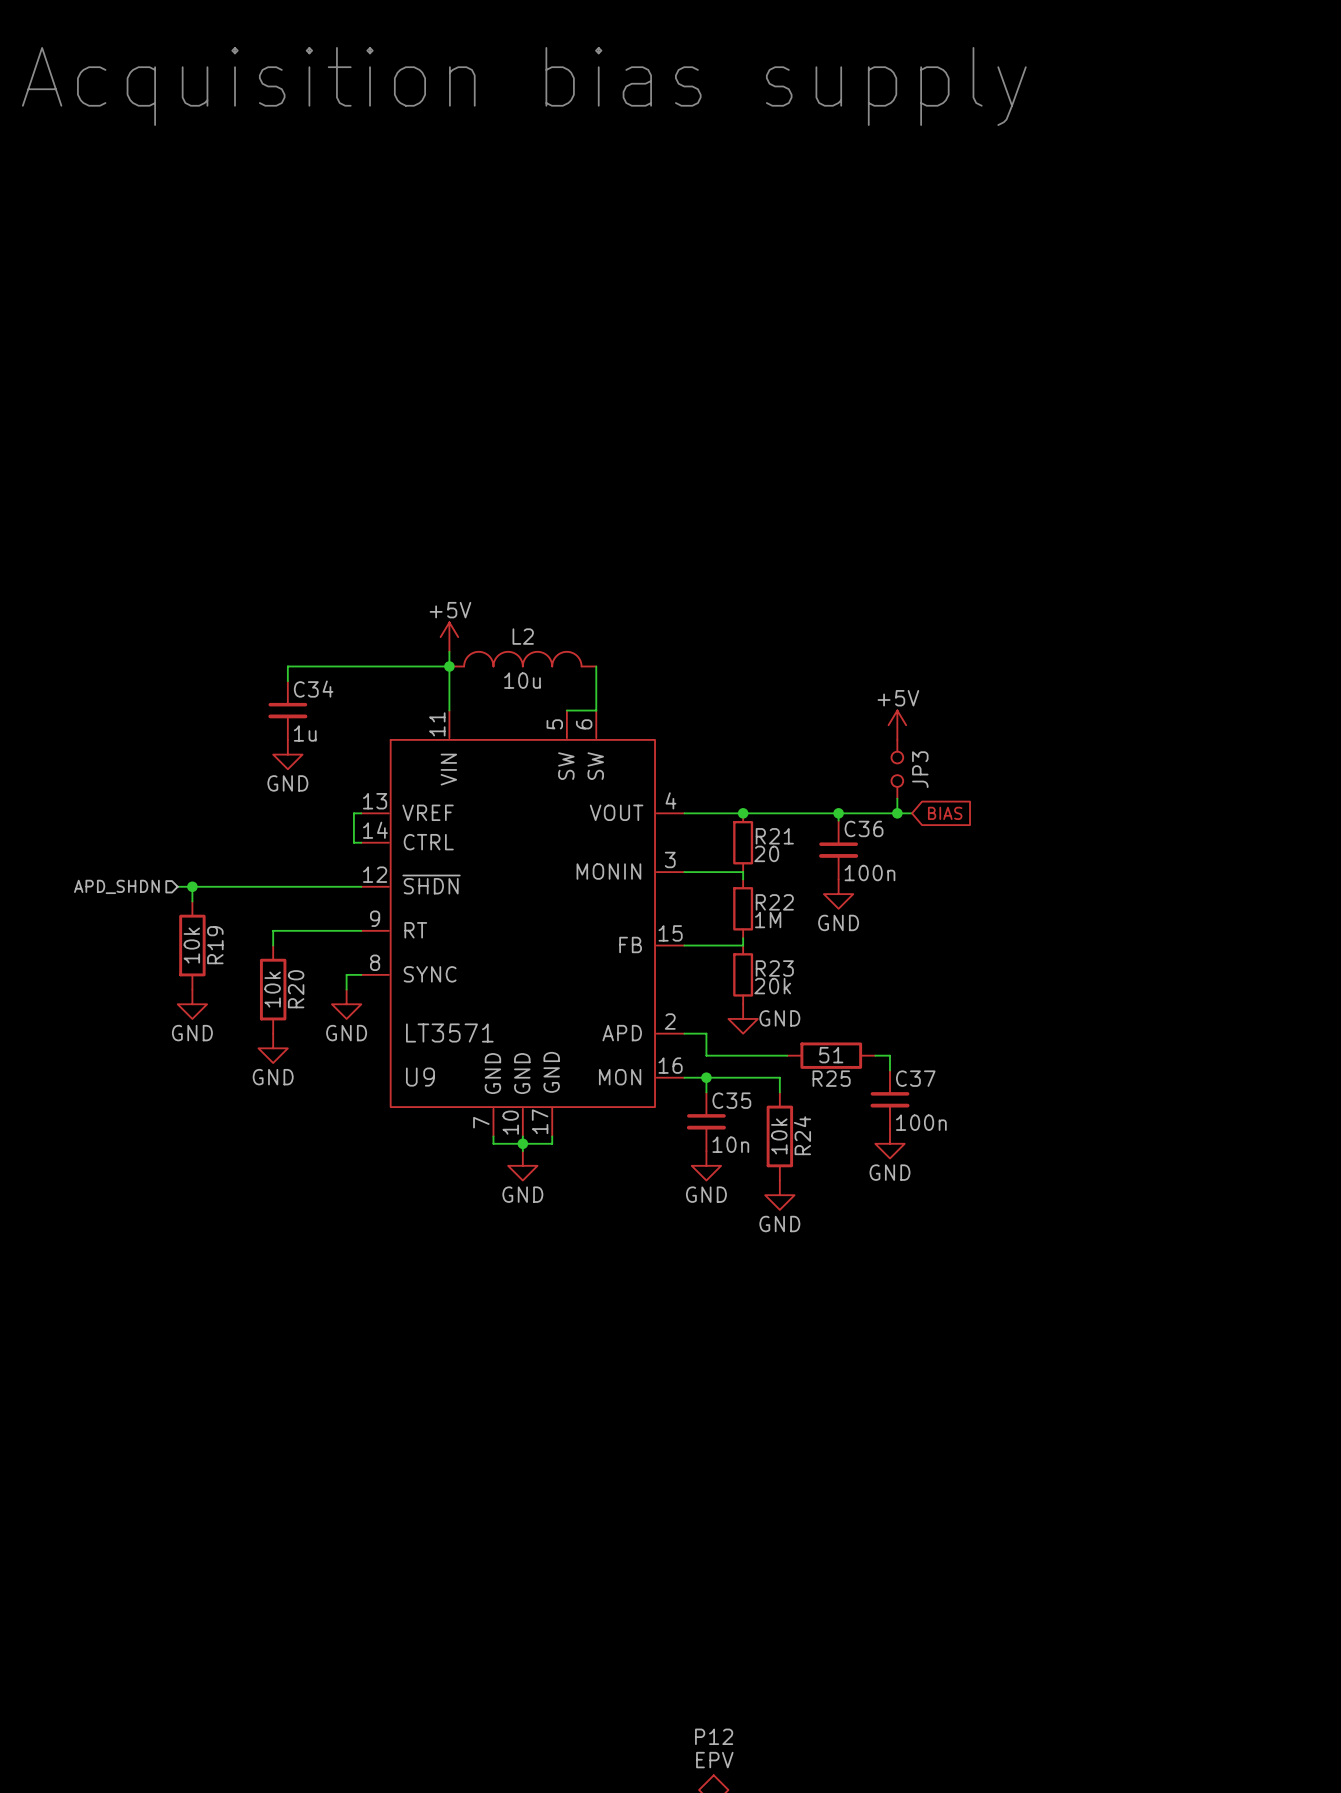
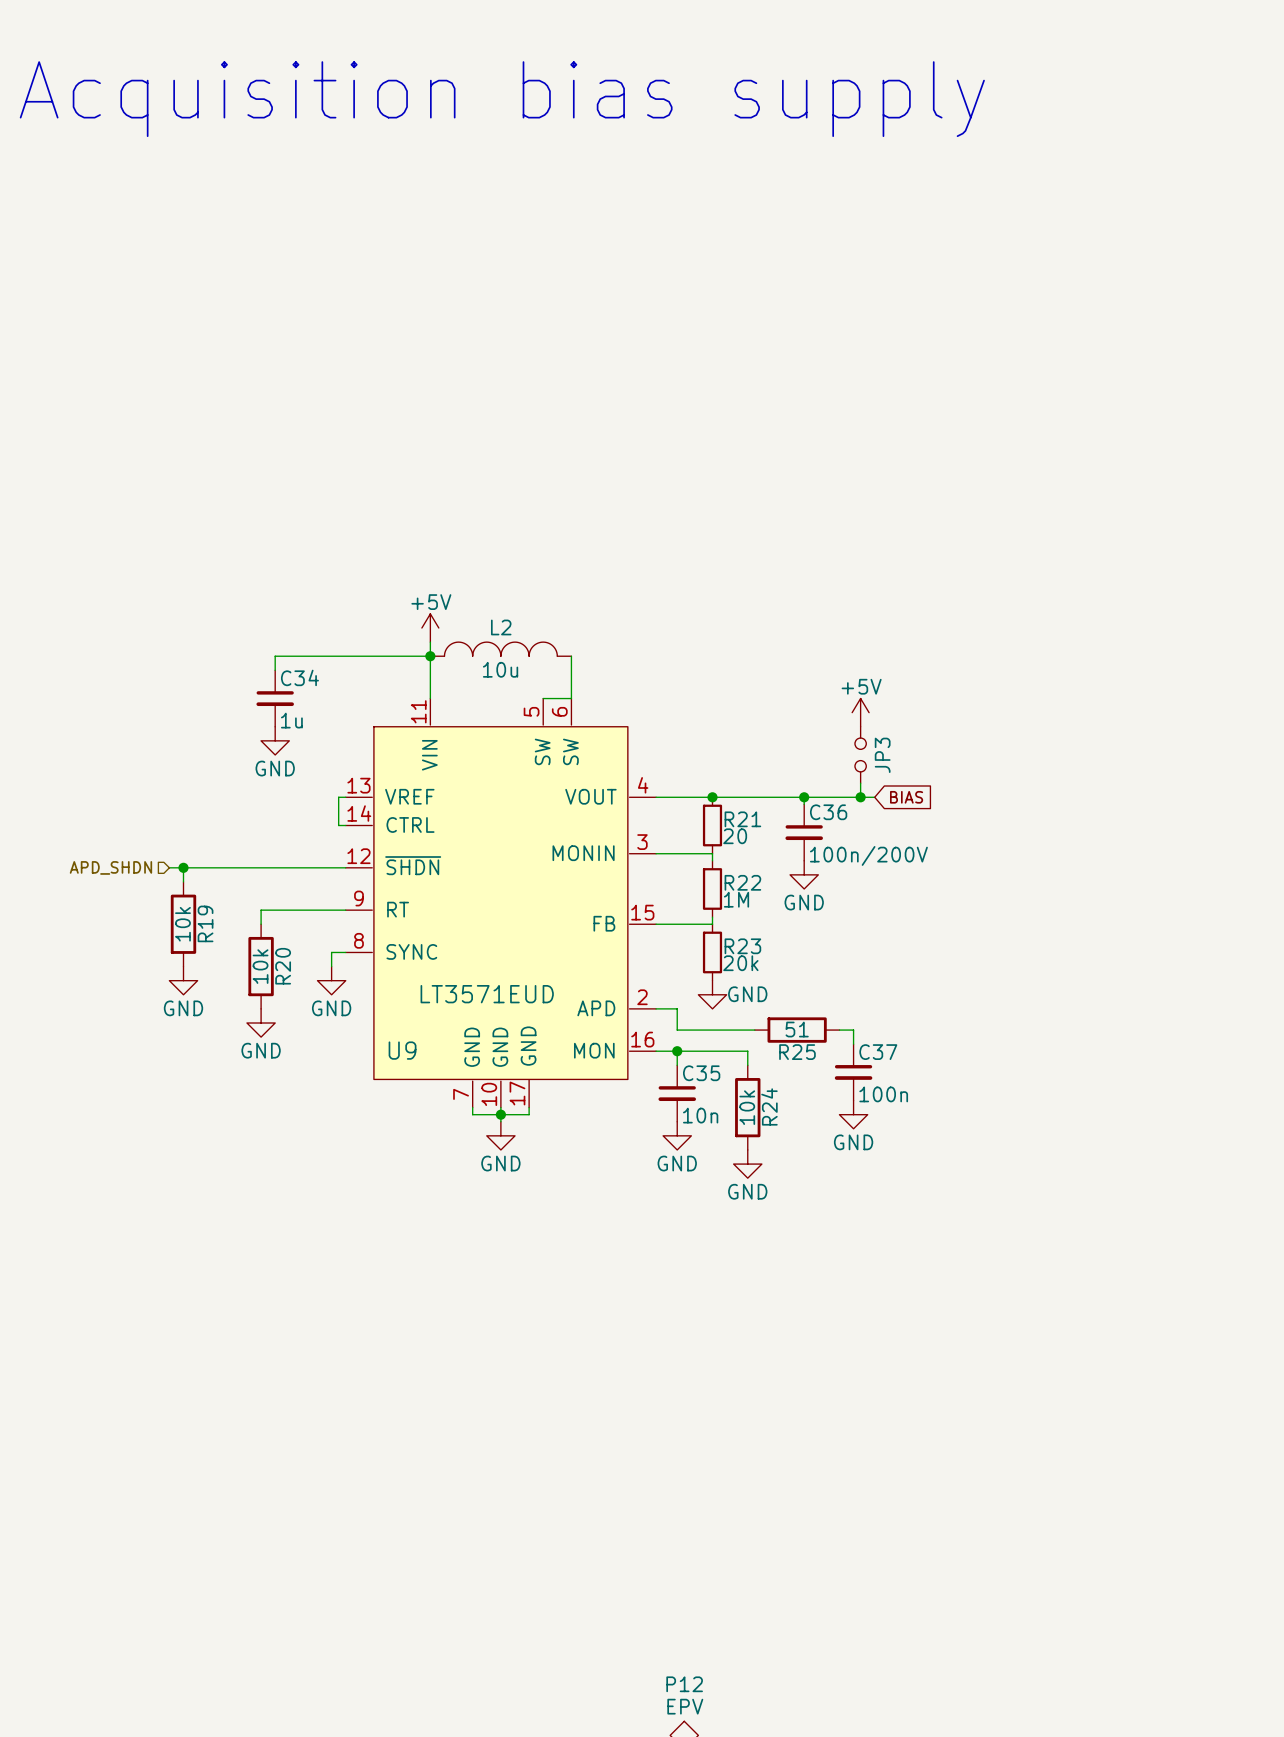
C36 value: 100n (869, 873) -> 100n/200V (868, 855)
U9 value: LT3571 (449, 1033) -> LT3571EUD (487, 994)

